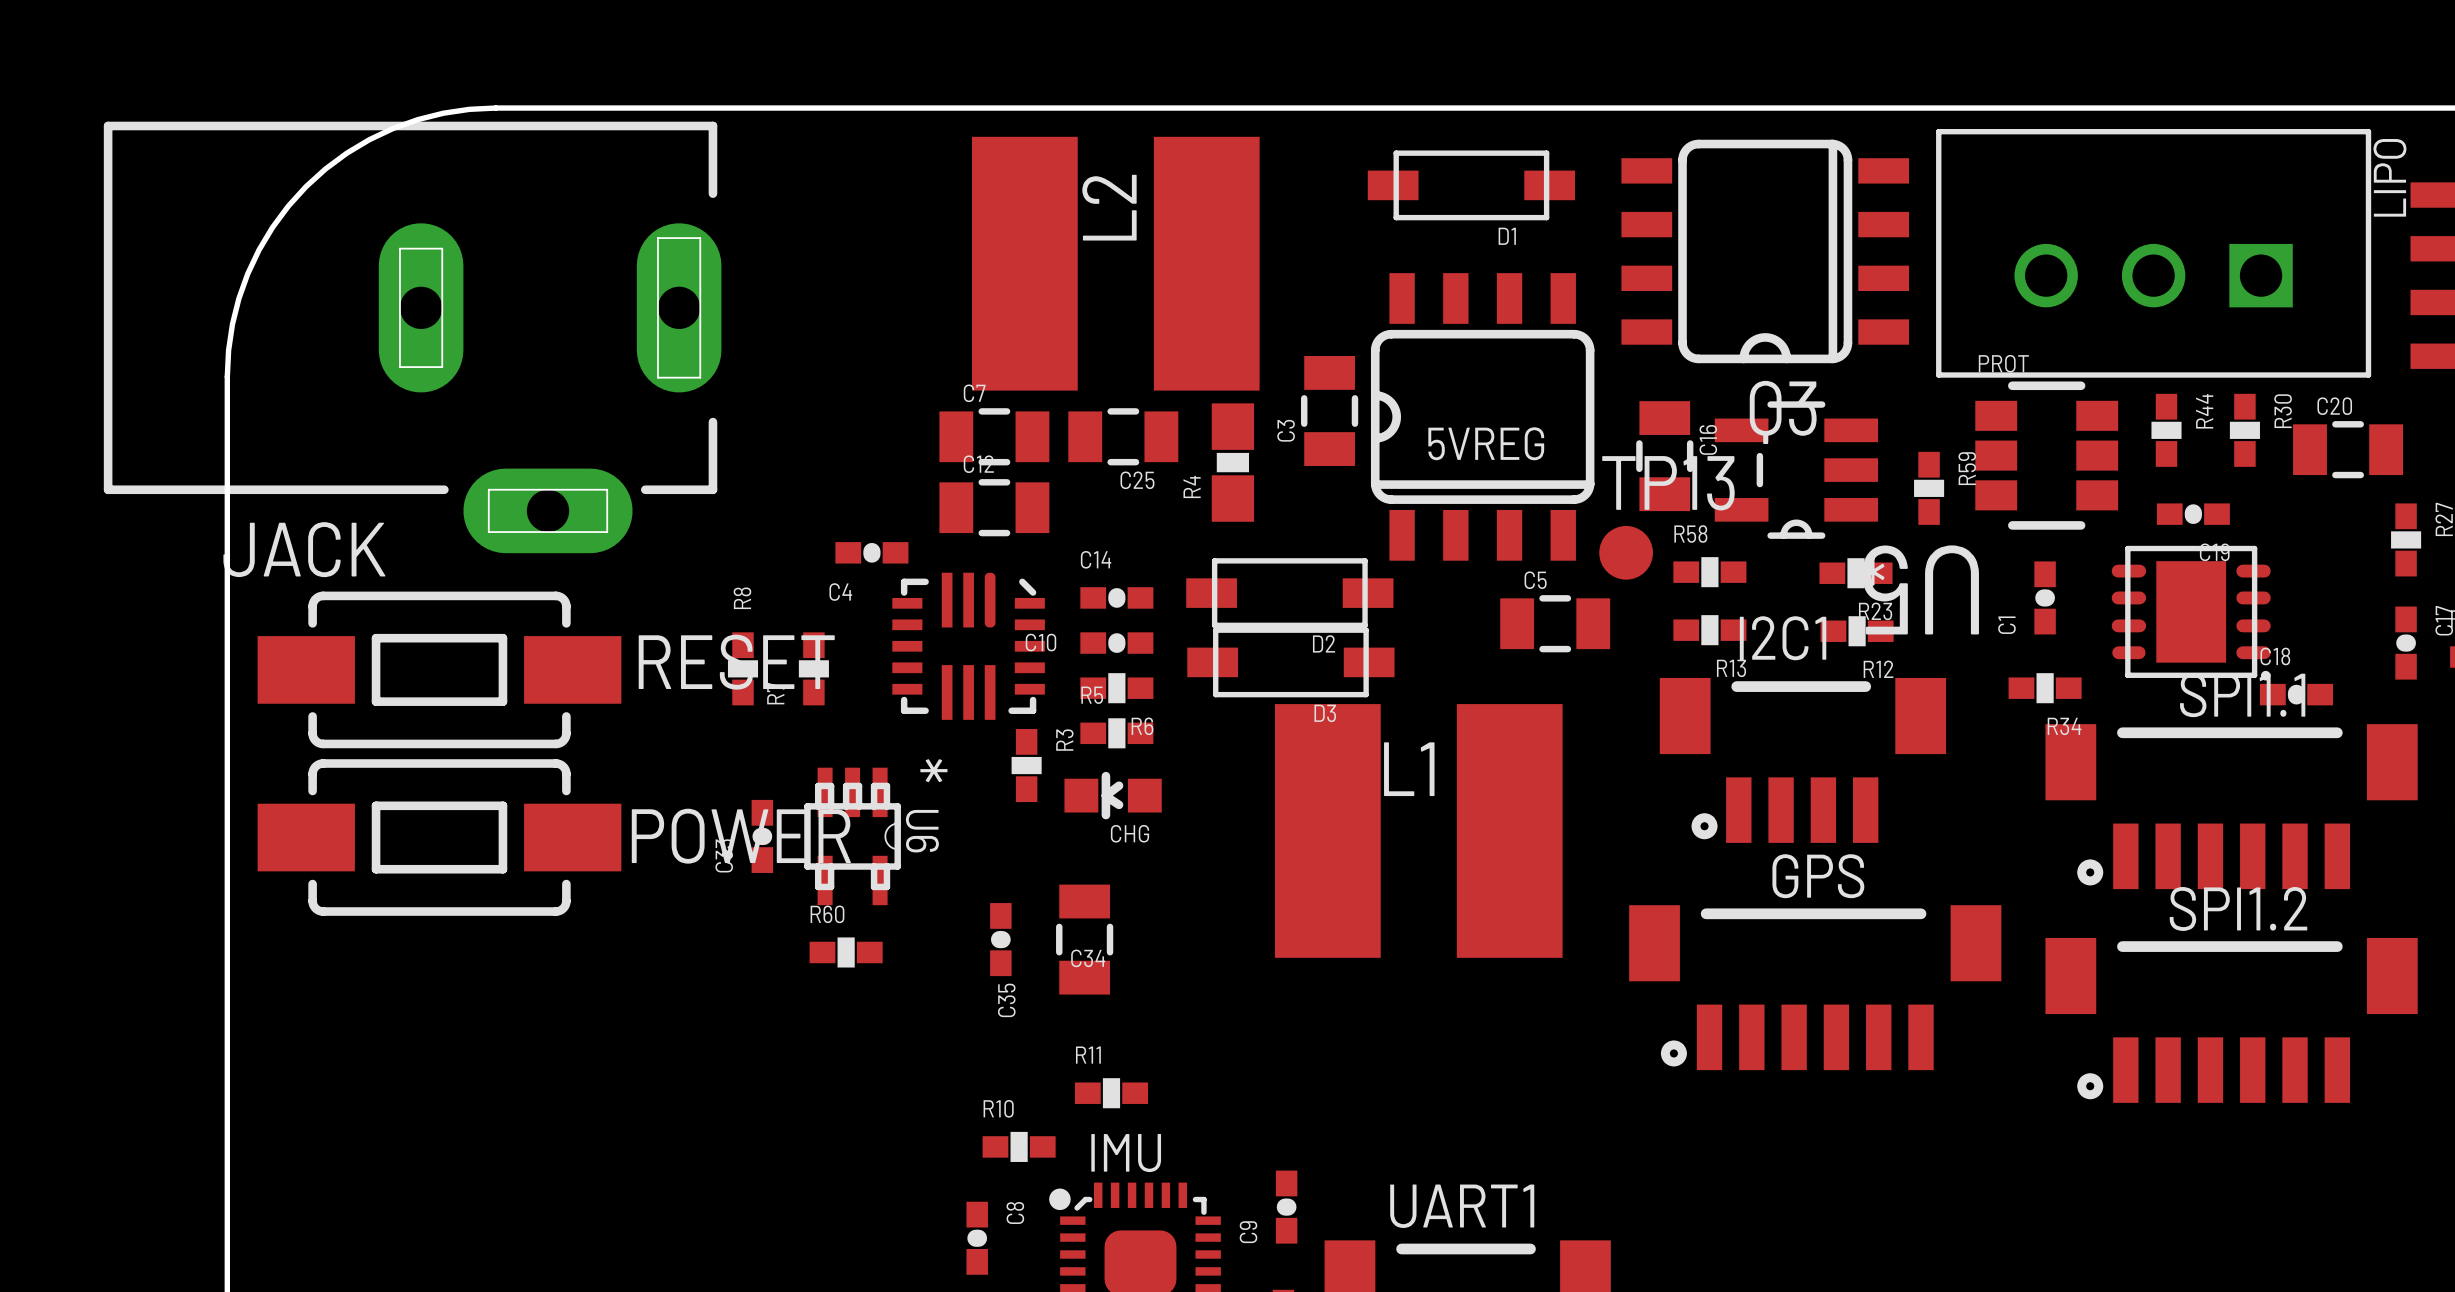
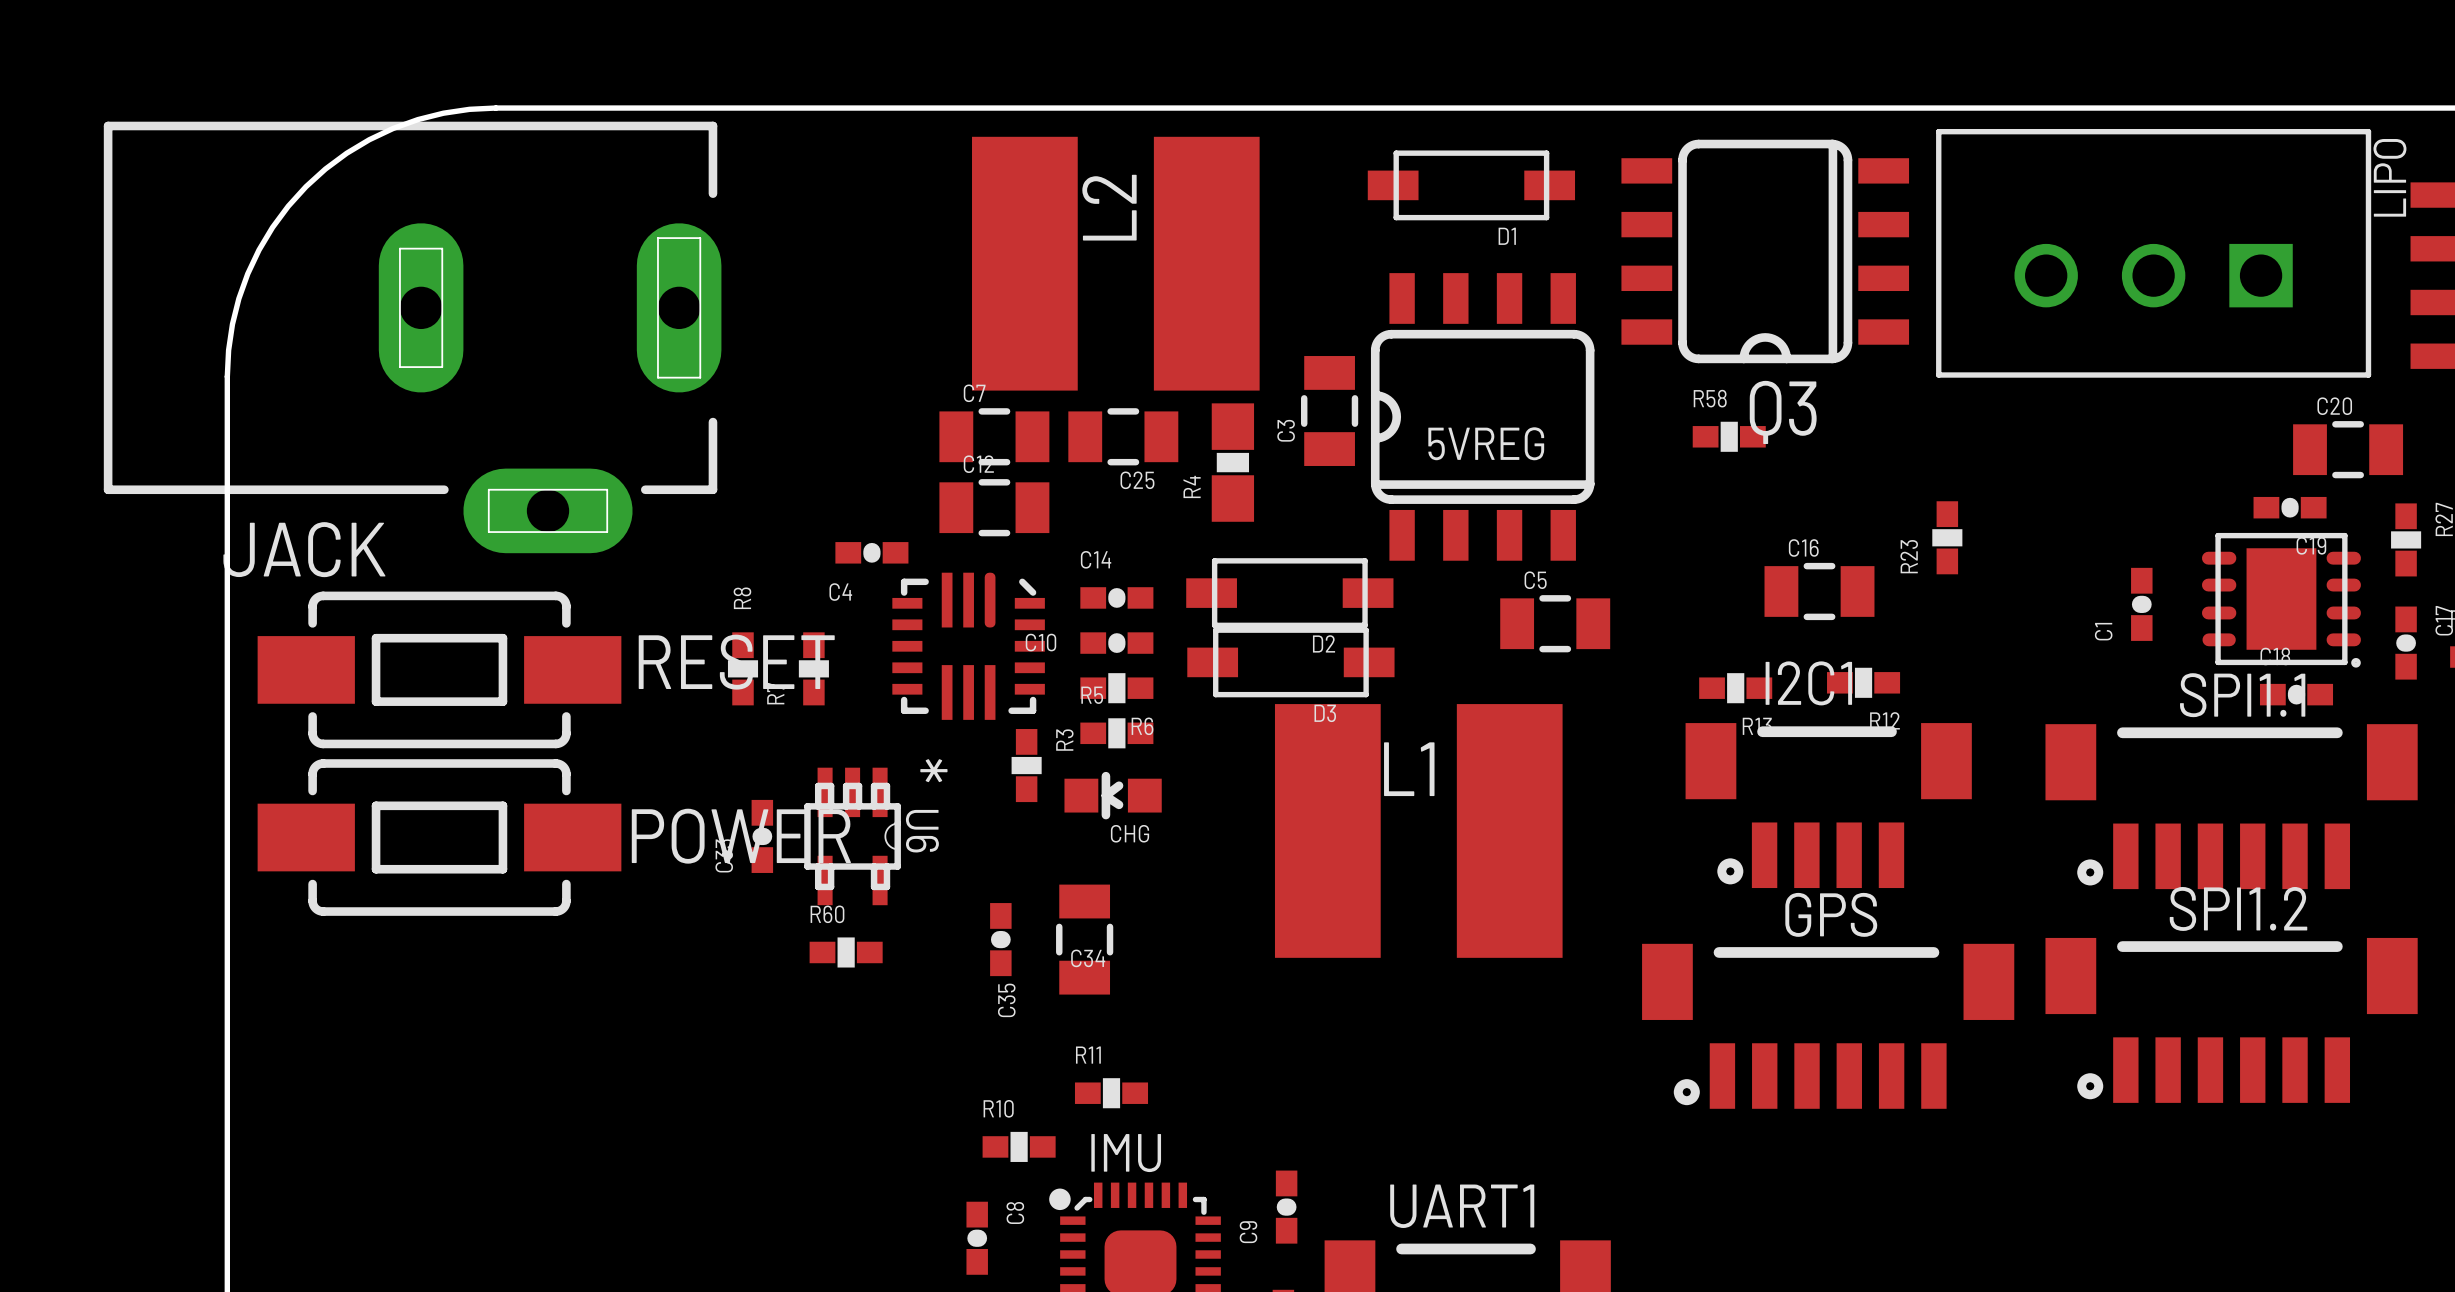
R44: (2166, 430) -> none
R30: (2244, 430) -> none
PROT: (2046, 455) -> none
C16 rotation: 0° (1664, 456) -> 90° clockwise (1819, 591)
C16 position: (1664, 456) -> (1819, 591)
U5: (1796, 470) -> none
R59: (1929, 488) -> none
C19 position: (2193, 514) -> (2290, 507)
TP13: (1626, 552) -> none
R58 position: (1709, 572) -> (1729, 436)
R23 rotation: 0° (1856, 573) -> 90° clockwise (1947, 537)
R23 position: (1856, 573) -> (1947, 537)
C1 position: (2045, 597) -> (2141, 604)
part position: (2191, 613) -> (2281, 600)
R13 position: (1709, 630) -> (1735, 688)
R12 position: (1857, 631) -> (1863, 682)
R34: (2045, 688) -> none
I2C1 position: (1802, 760) -> (1828, 805)
GPS position: (1815, 987) -> (1828, 1026)

